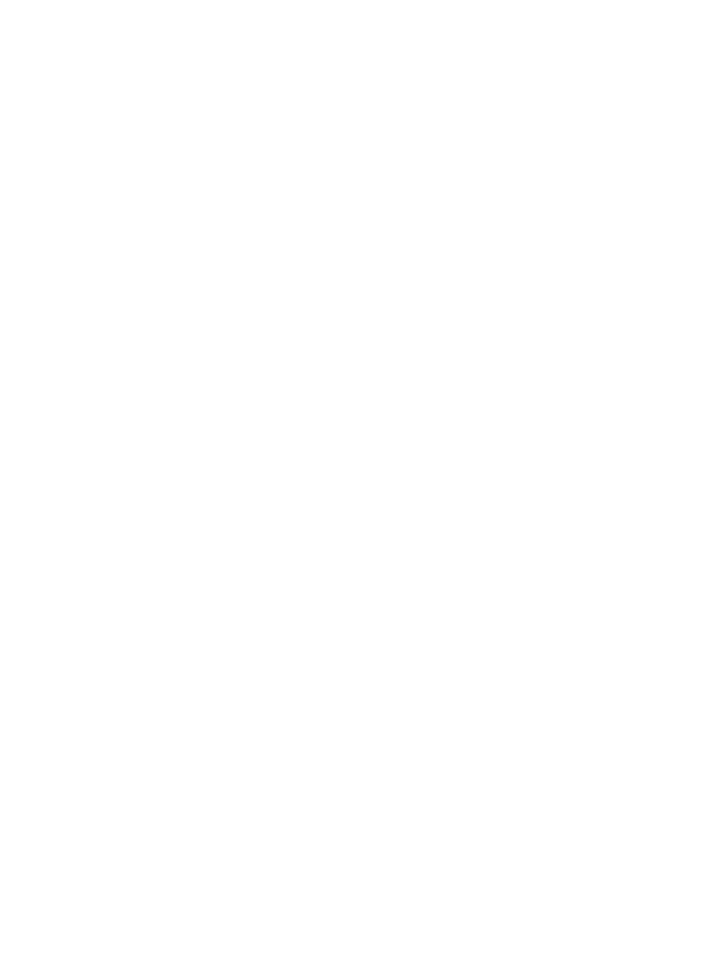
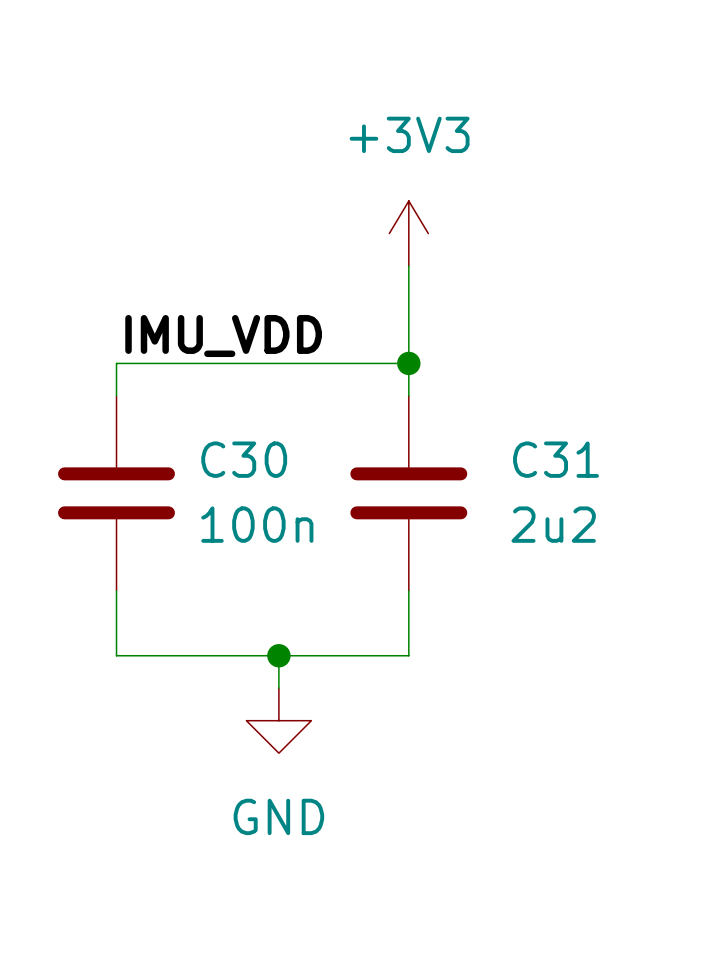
power symbol: none -> +3V3 (408, 233)
wire: none -> (408, 266) (408, 395)
label: none -> IMU_VDD (223, 336)
wire: none -> (408, 363) (116, 363) (116, 395)
junction: none -> (408, 363)
C30: none -> 100n (116, 493)
C31: none -> 2u2 (408, 493)
wire: none -> (116, 590) (116, 655) (408, 655) (408, 590)
wire: none -> (278, 655) (278, 688)
junction: none -> (278, 655)
power symbol: none -> GND (278, 720)

